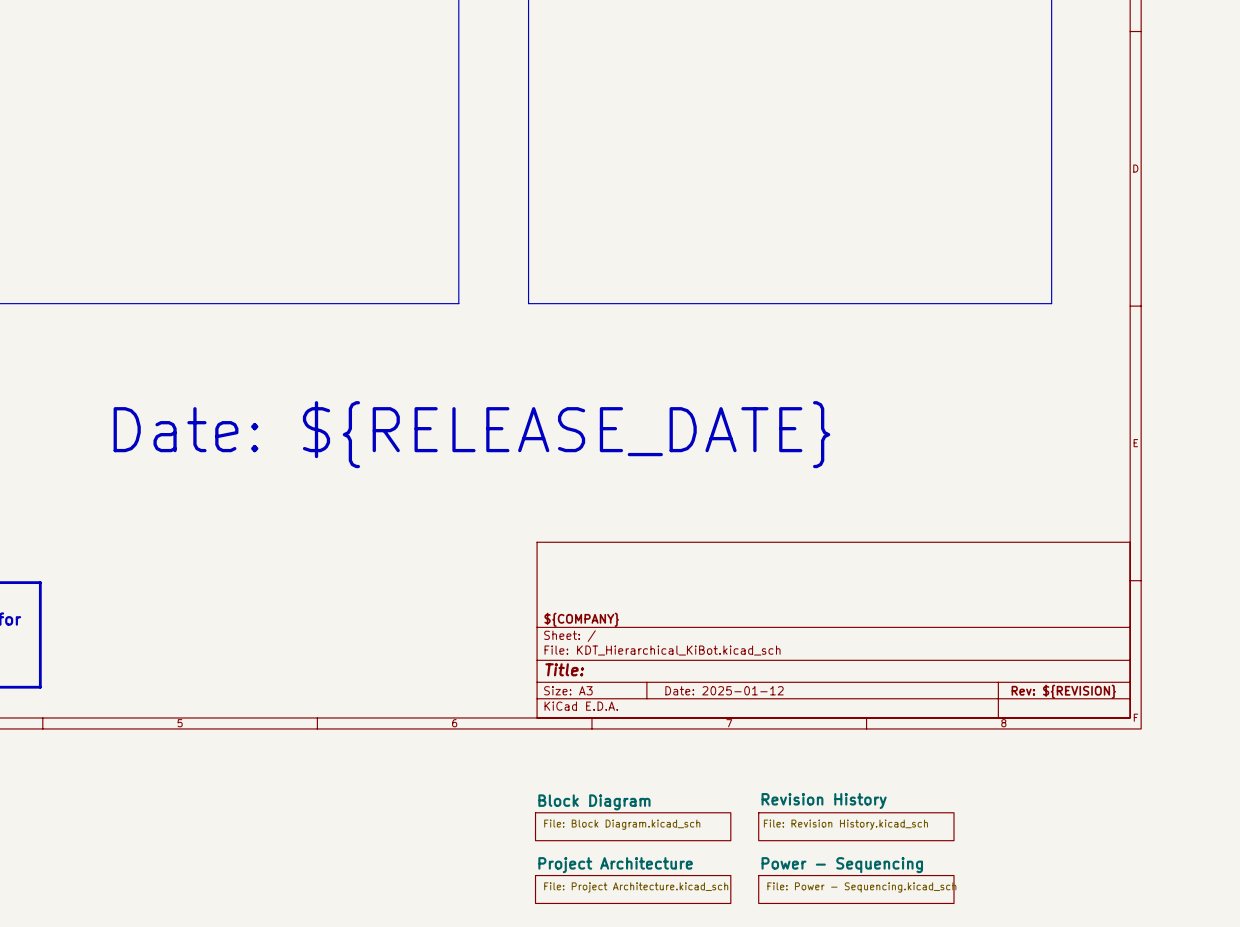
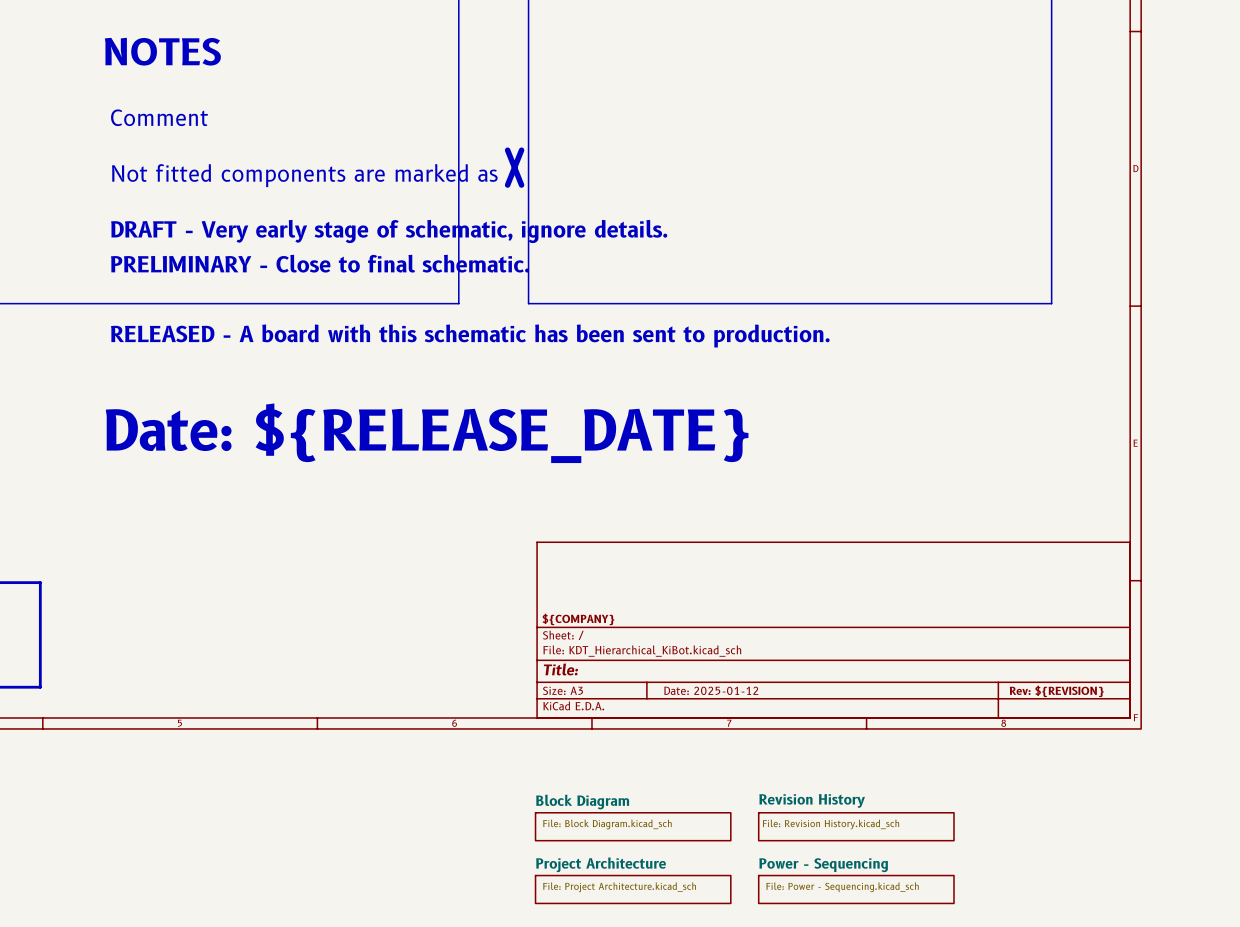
text: none -> NOTES (162, 51)
text: none -> Comment (159, 117)
line: none -> (507, 150) (521, 185)
line: none -> (521, 150) (507, 185)
text: none -> Not fitted components are marked as (304, 175)
text: none -> DRAFT - Very early stage of schematic, ignore details. (389, 231)
text: none -> PRELIMINARY - Close to final schematic. (320, 263)
text: none -> RELEASED - A board with this schematic has been sent to production. (470, 335)

